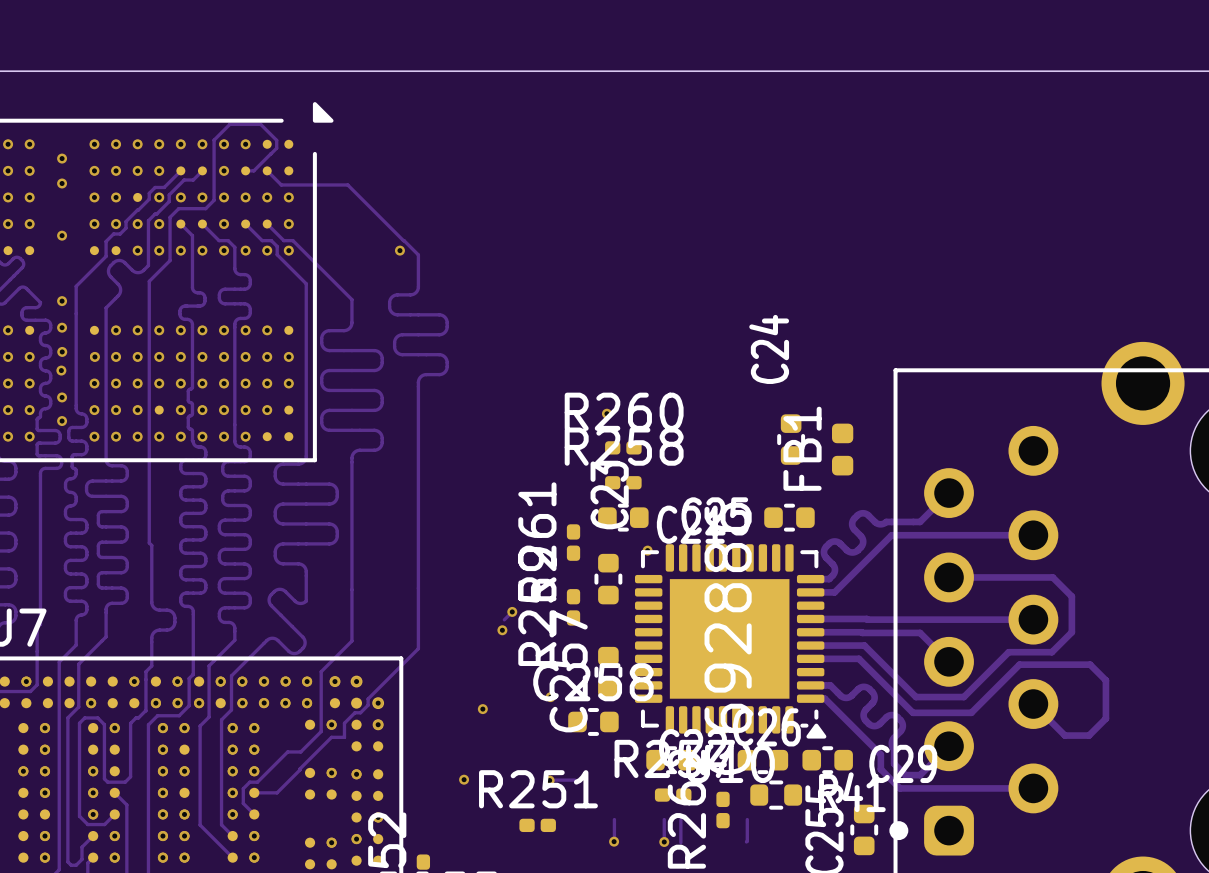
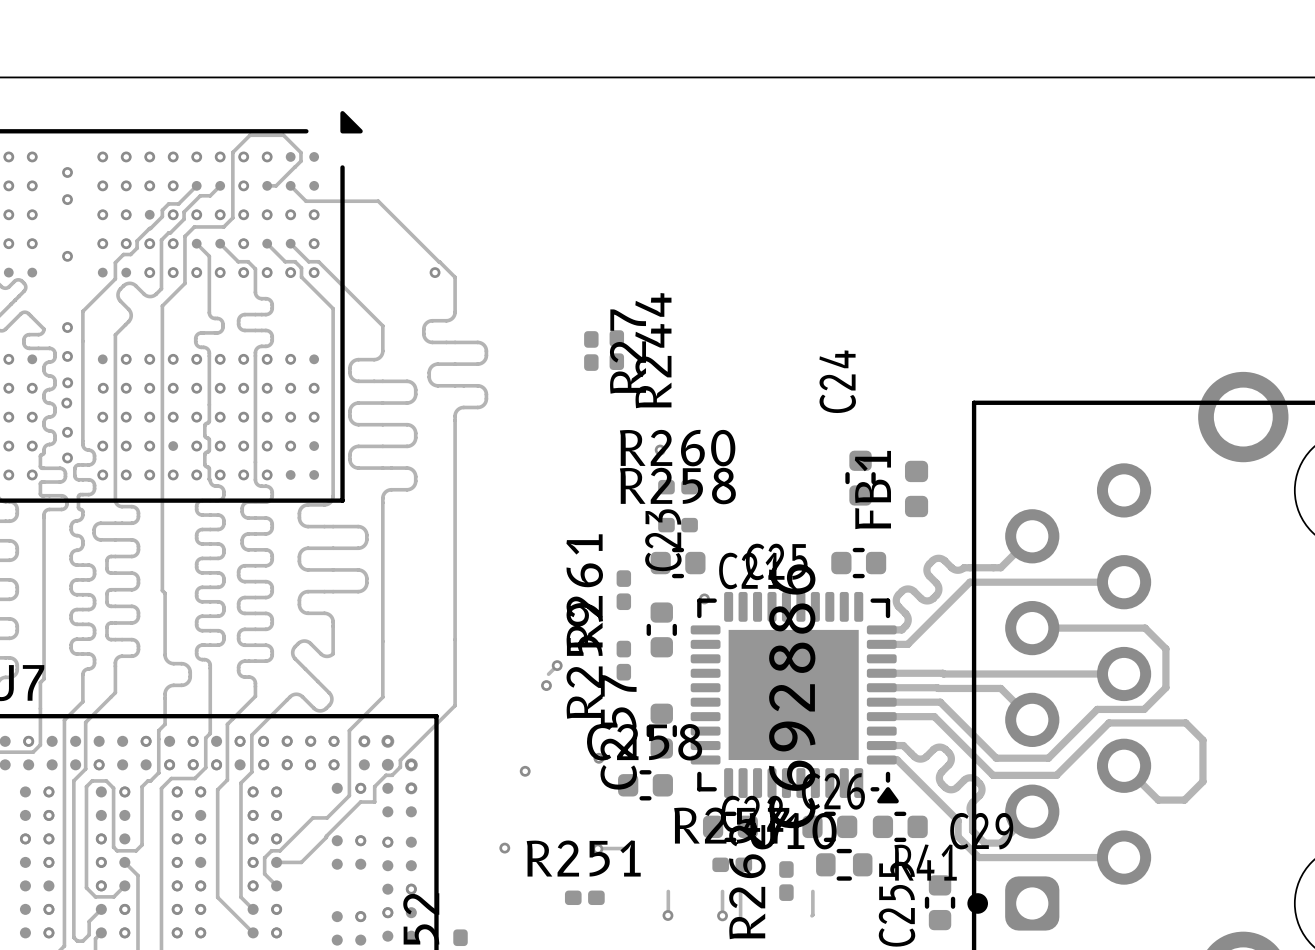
R244: none -> (616, 350)
R27: none -> (591, 351)

